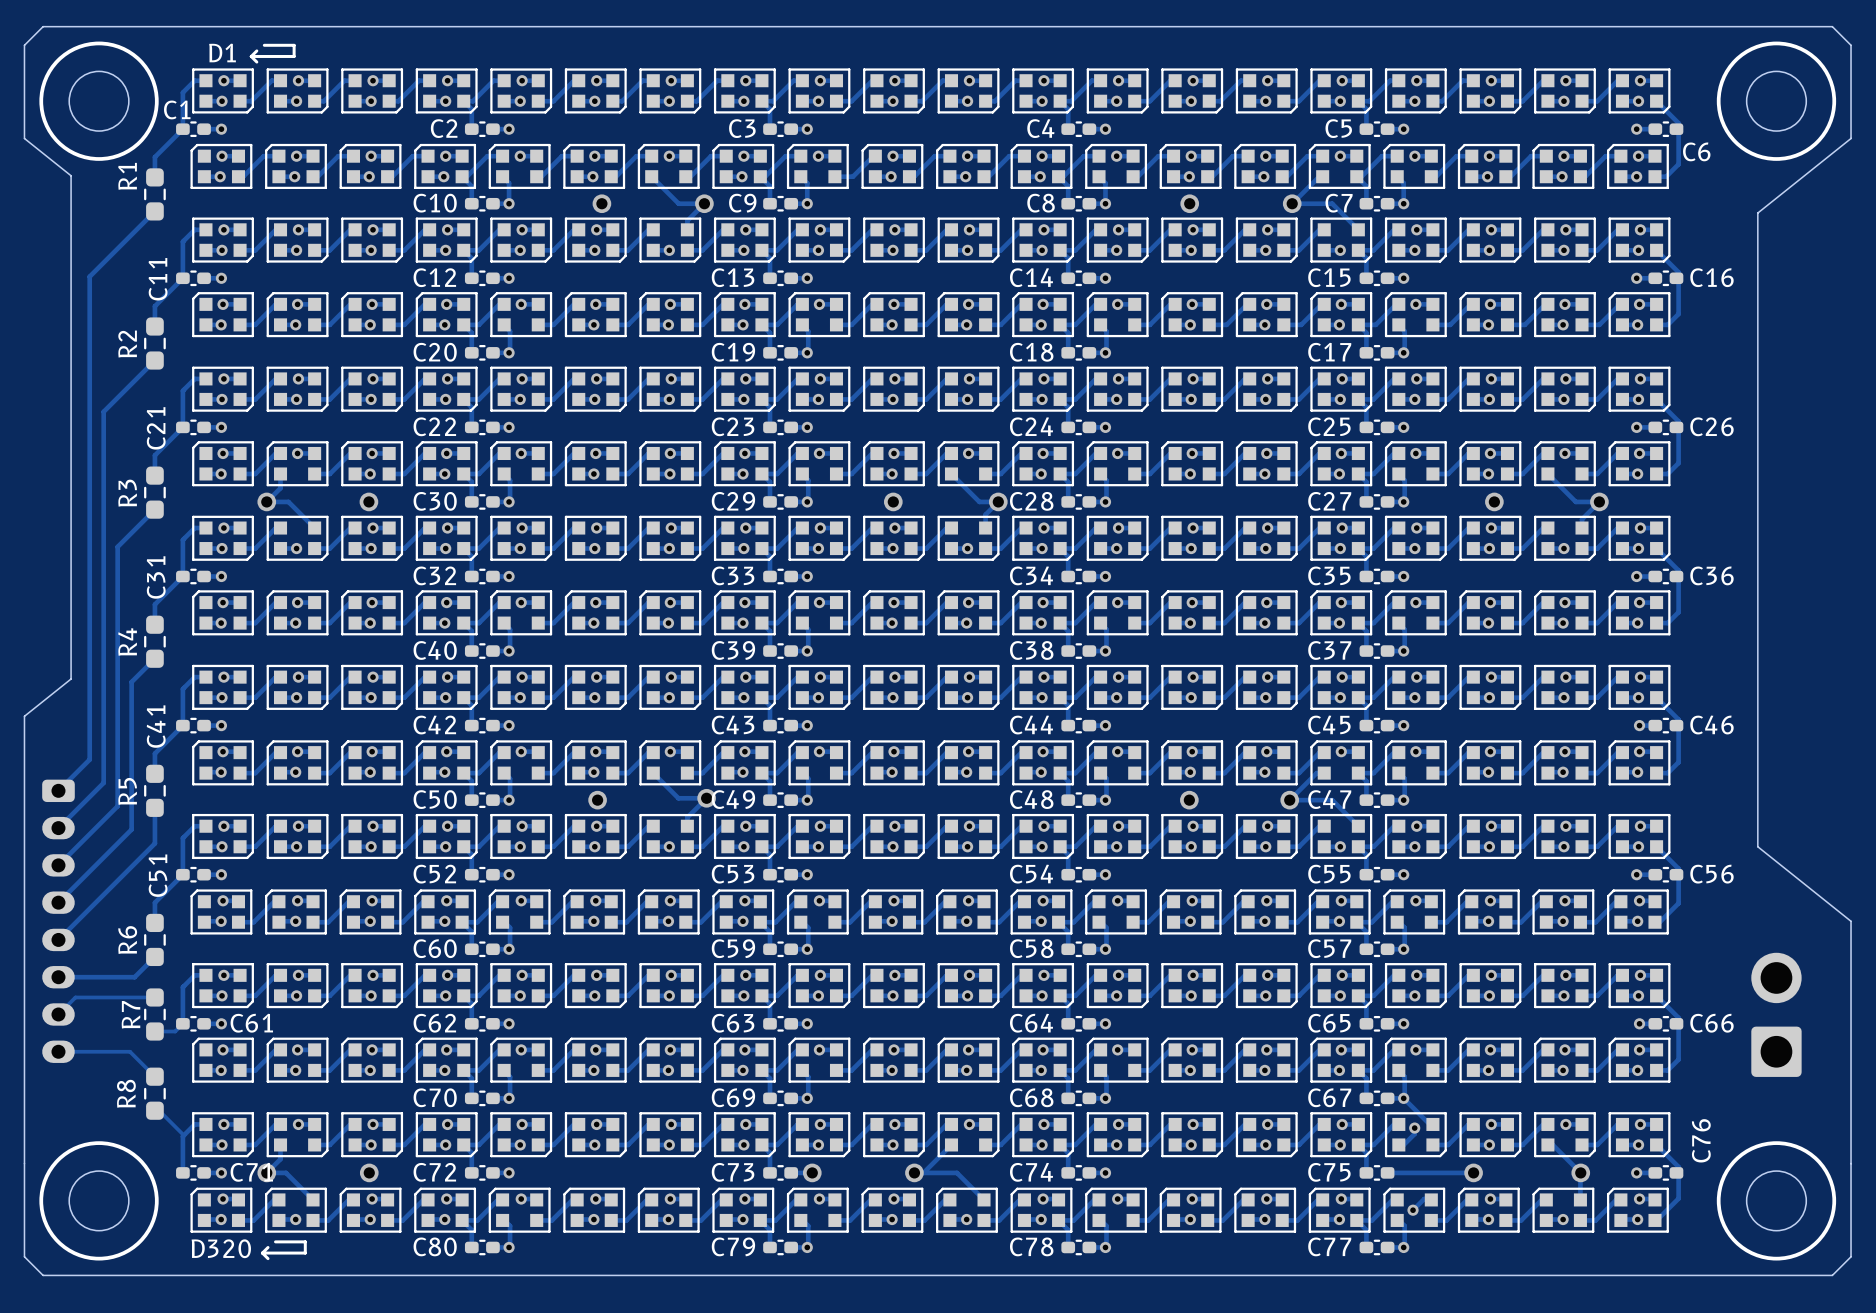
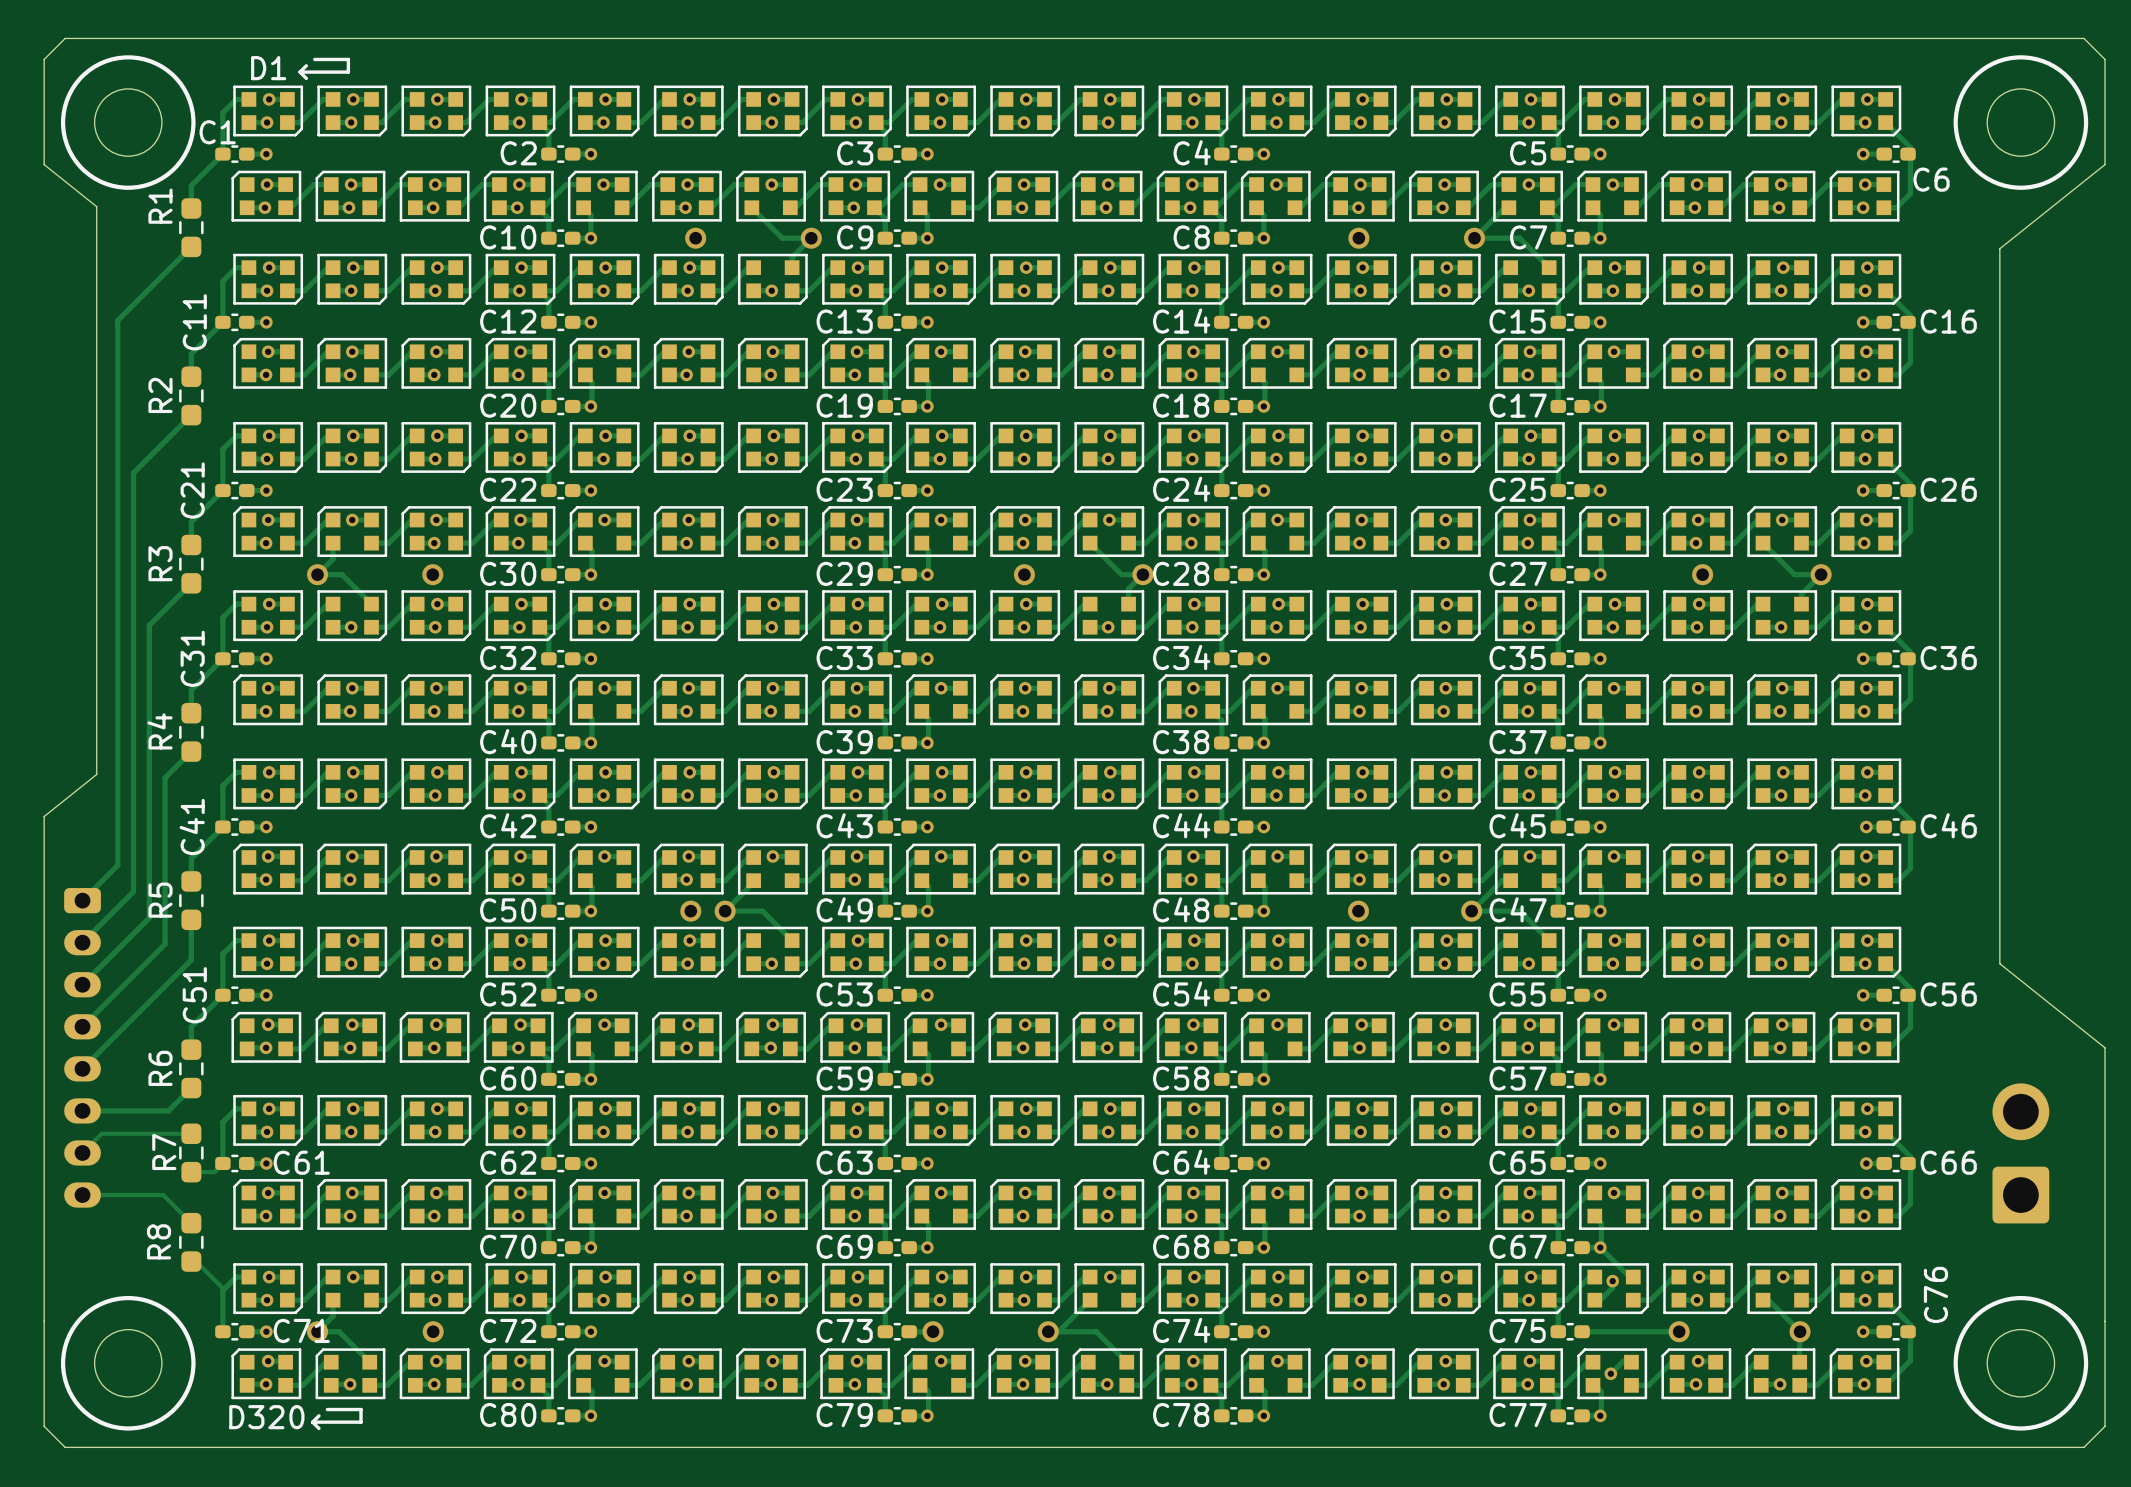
track: (653, 773) (678, 798) (706, 798) (687, 817) (687, 826) -> (753, 882) (725, 911) (762, 911) (792, 940)
via position: (706, 798) -> (725, 911)

